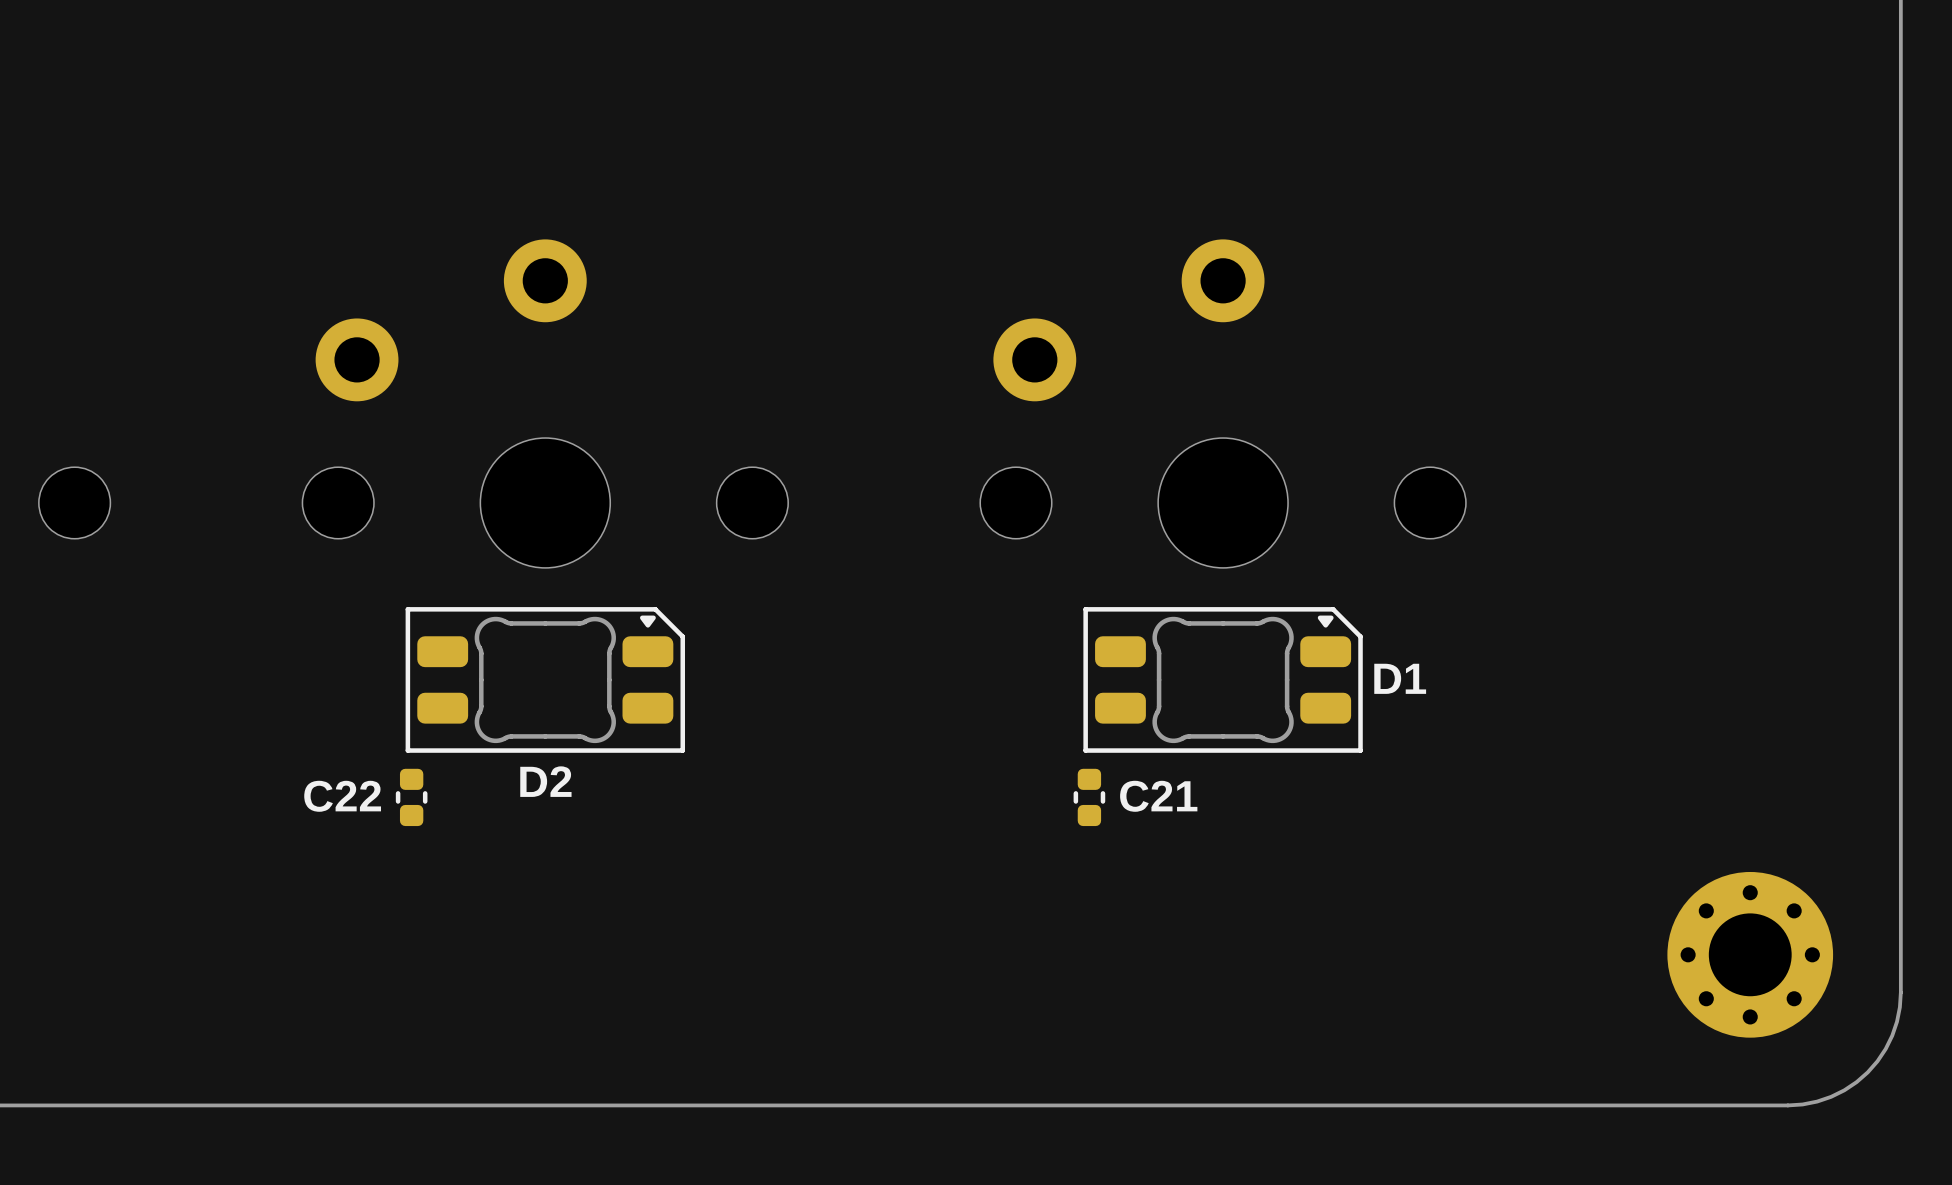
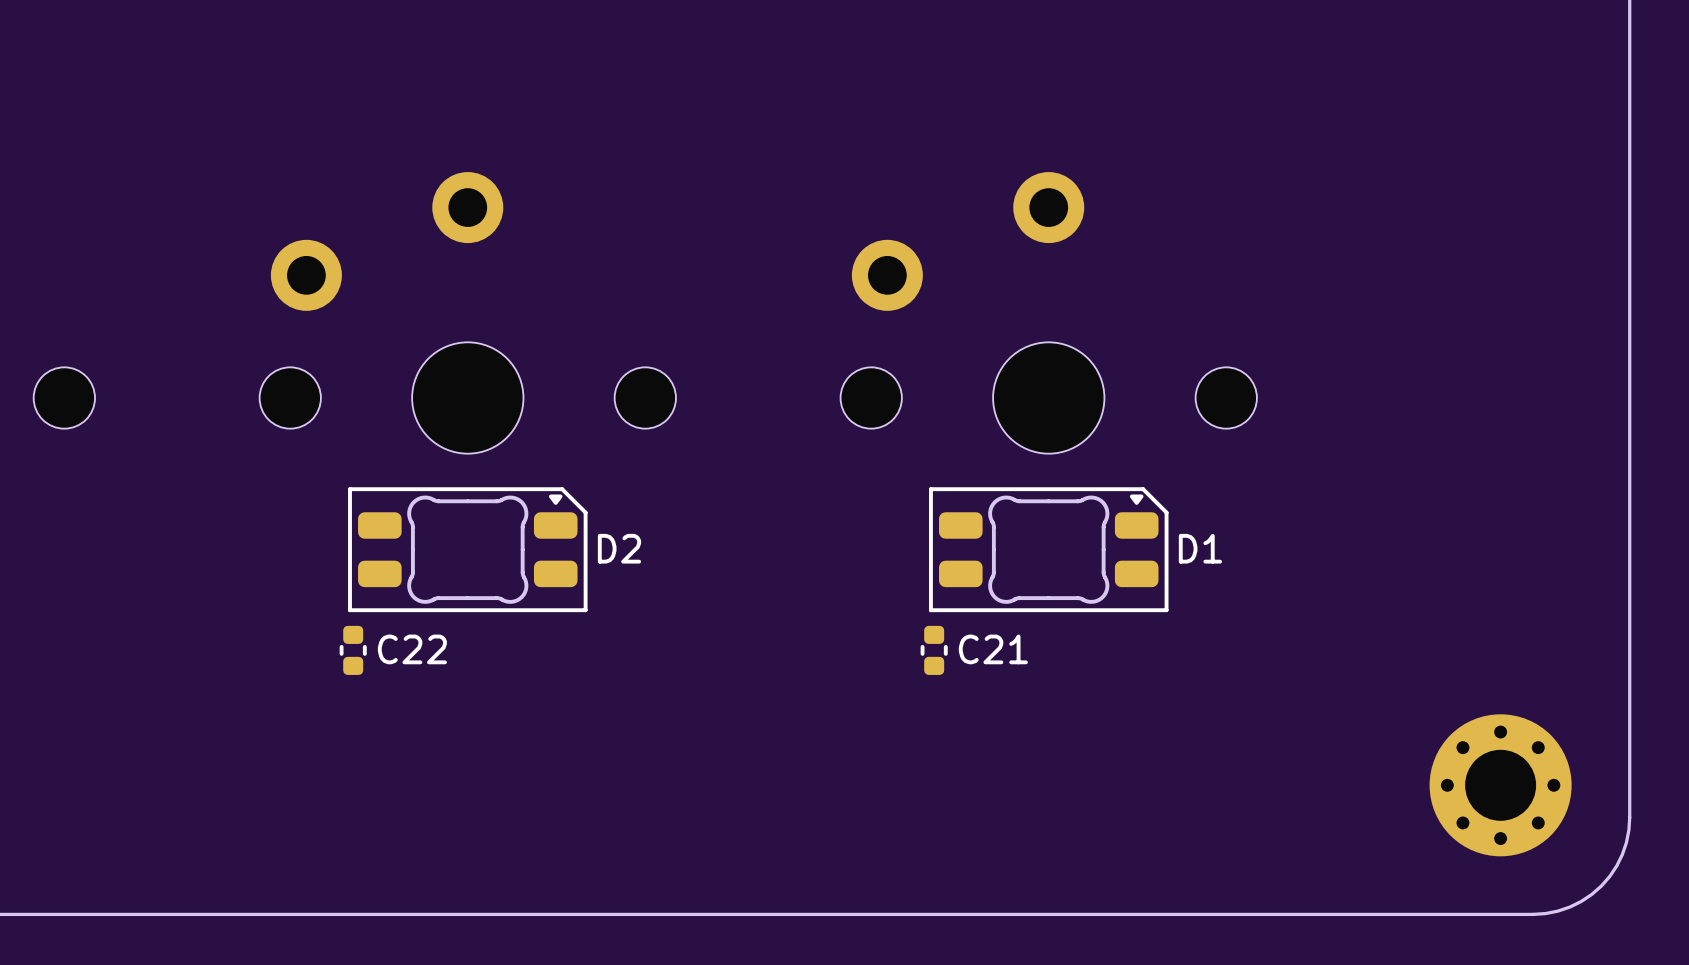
D2 name position: D2 (545, 781) -> D2 (619, 548)
C22 name position: C22 (342, 796) -> C22 (412, 649)

